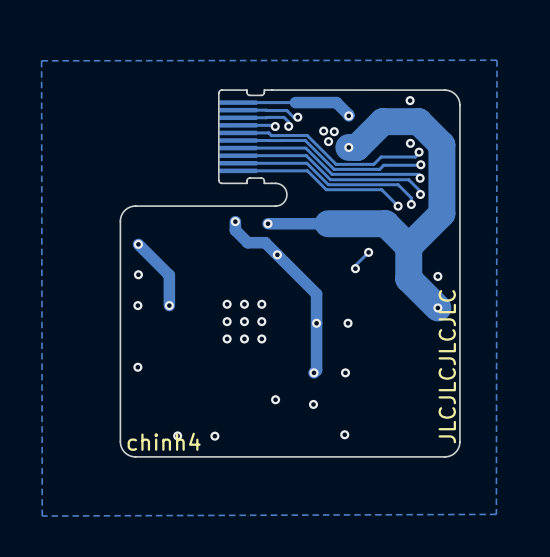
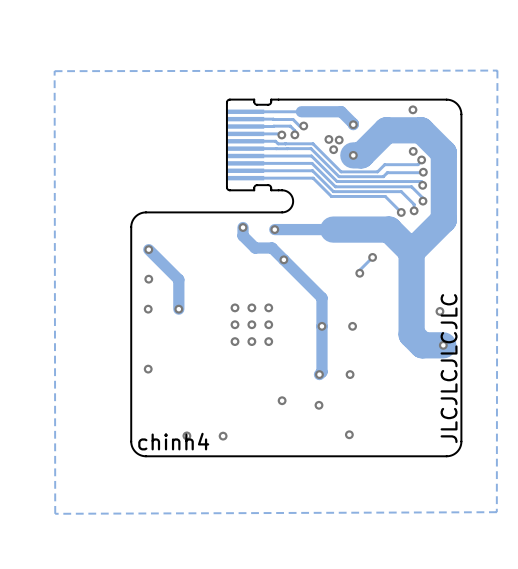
via position: (437, 276) -> (443, 345)
track: (408, 278) (437, 307) -> (411, 283) (411, 334) (422, 345) (443, 345)

